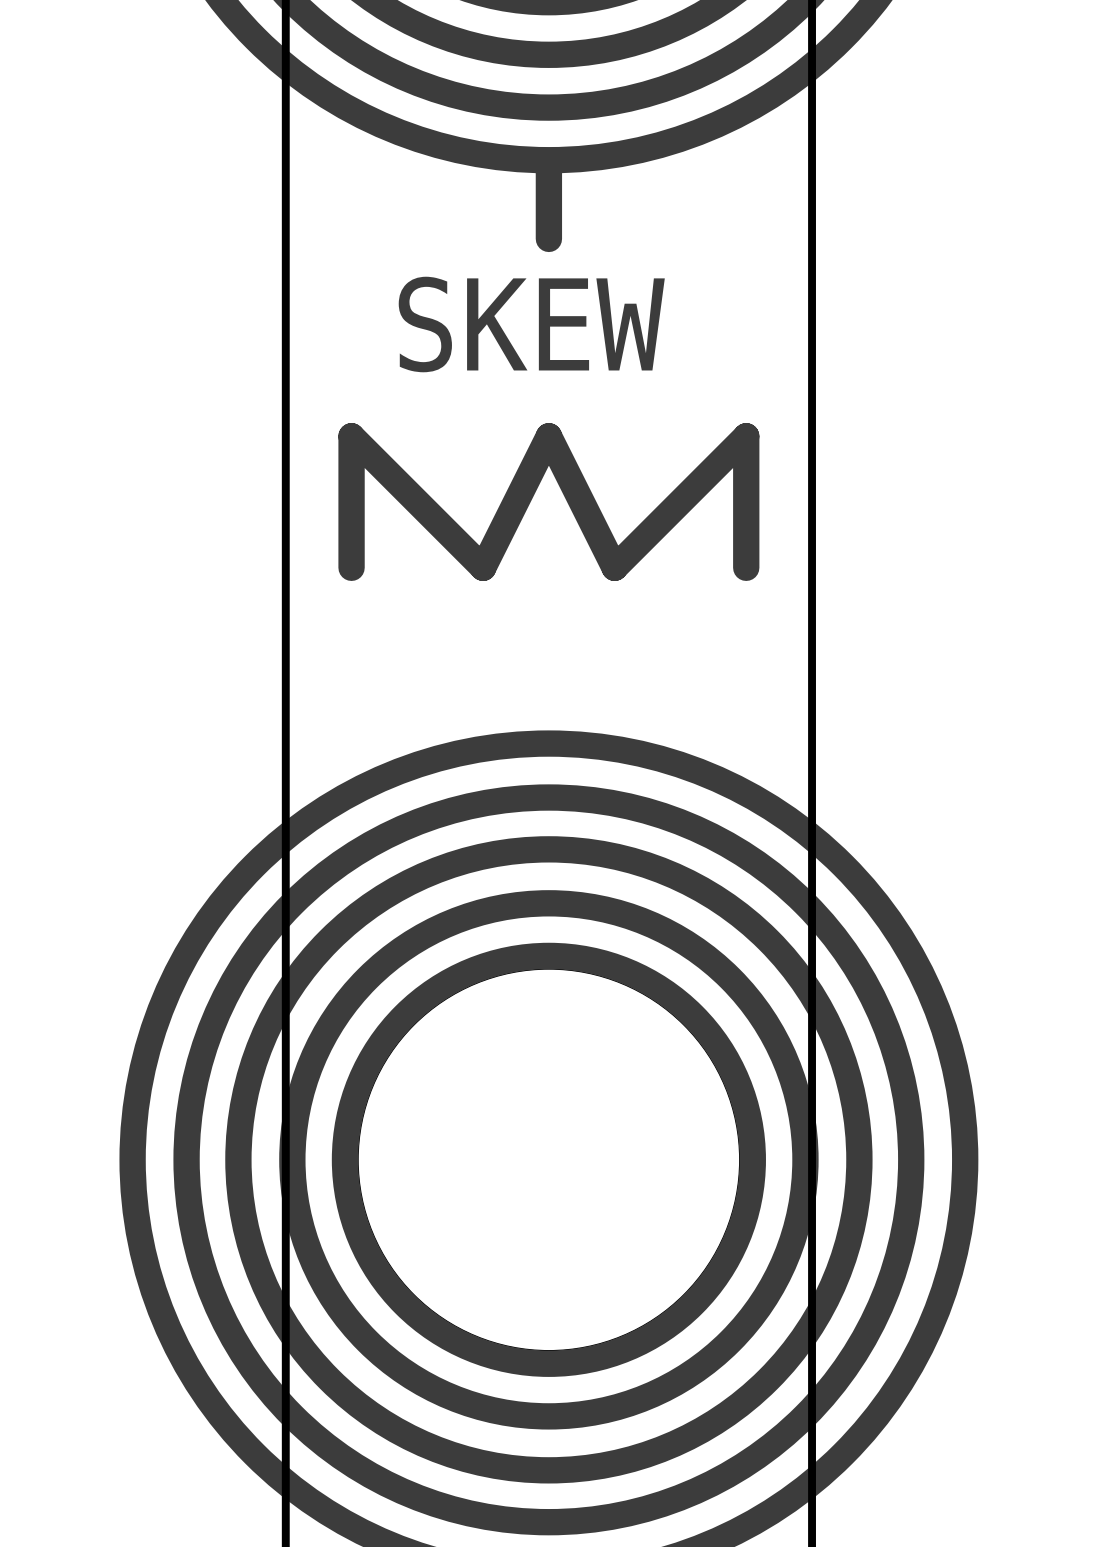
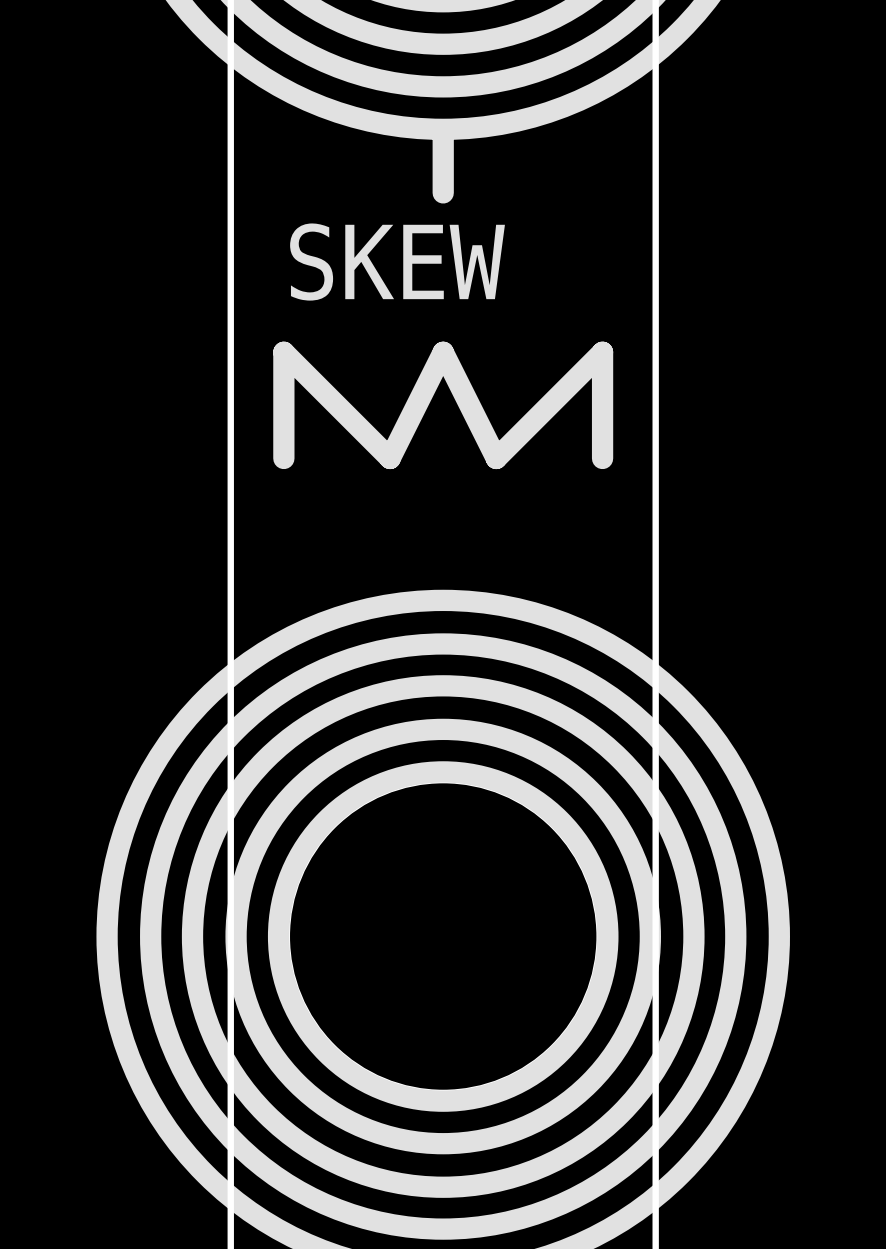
text position: SKEW (531, 324) -> SKEW (397, 262)

